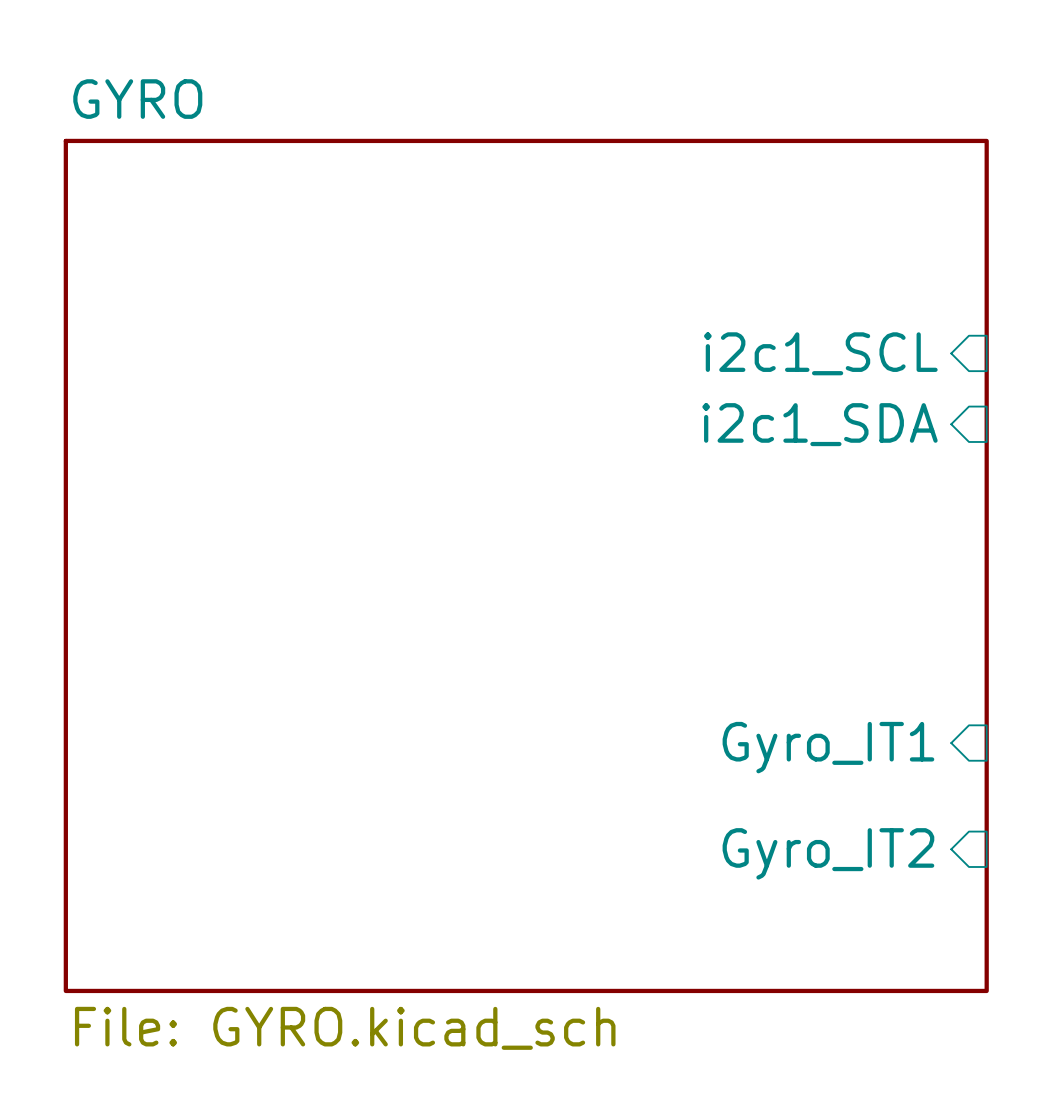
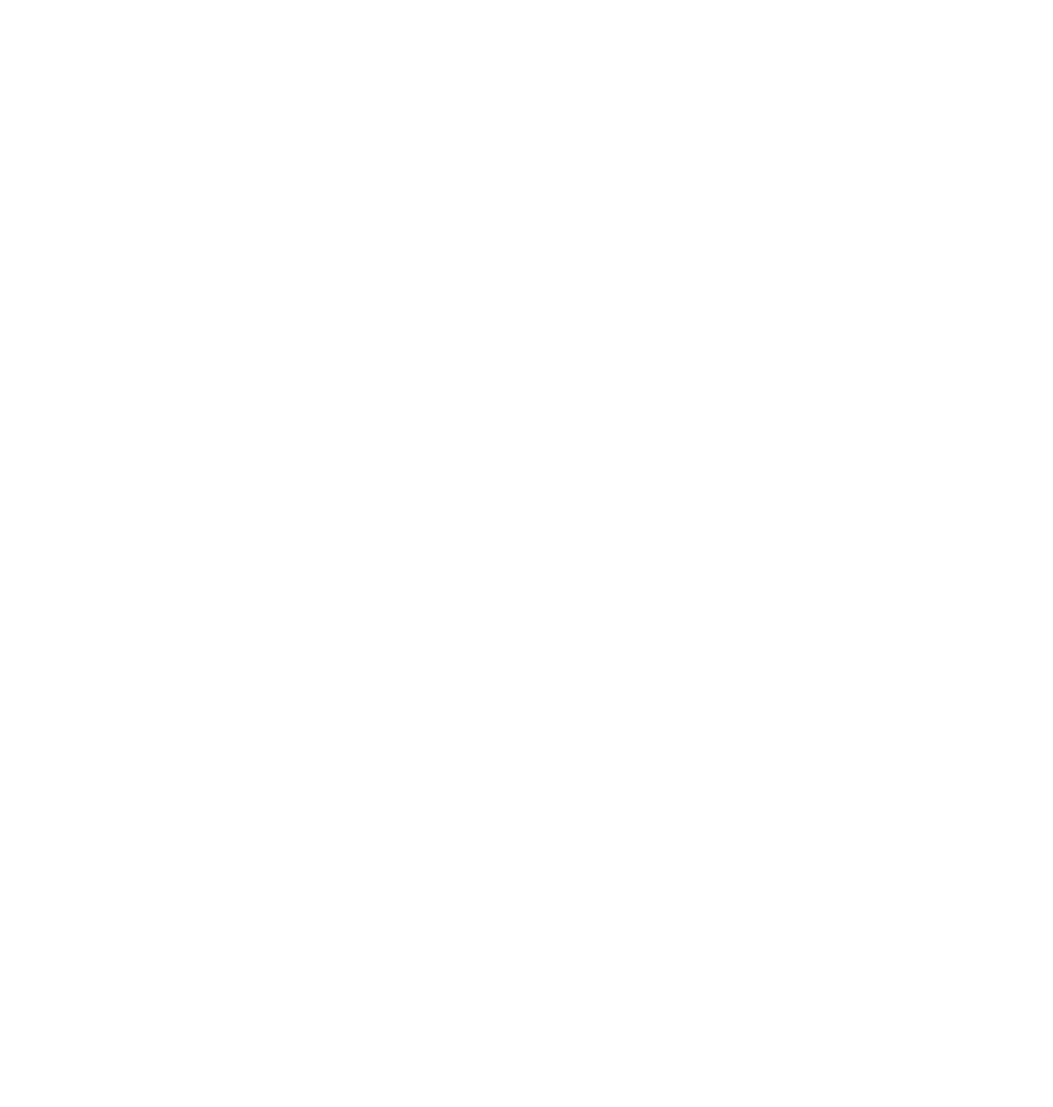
sheet pin: i2c1_SCL (820, 353) -> none
sheet pin: i2c1_SDA (820, 424) -> none
sheet GYRO: File: GYRO.kicad_sch (526, 565) -> none
sheet pin: Gyro_IT1 (828, 747) -> none
sheet pin: Gyro_IT2 (828, 853) -> none

